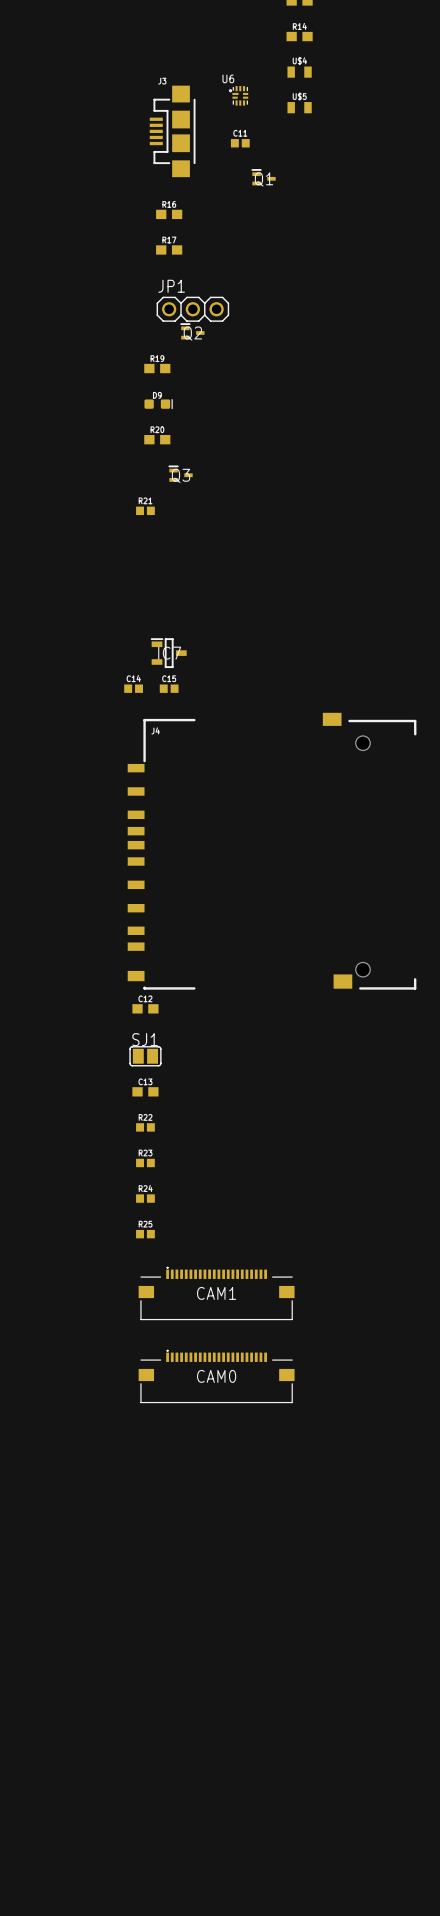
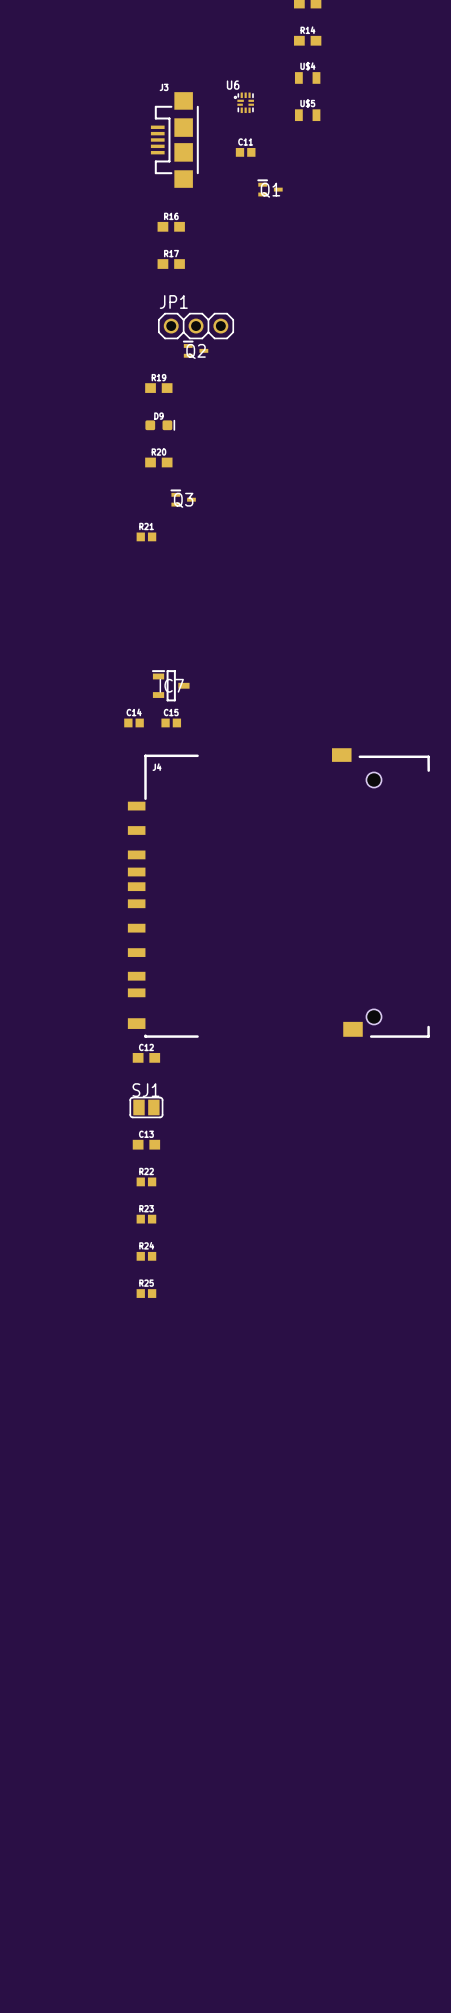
CAM1: (216, 1293) -> none
CAM0: (216, 1376) -> none

